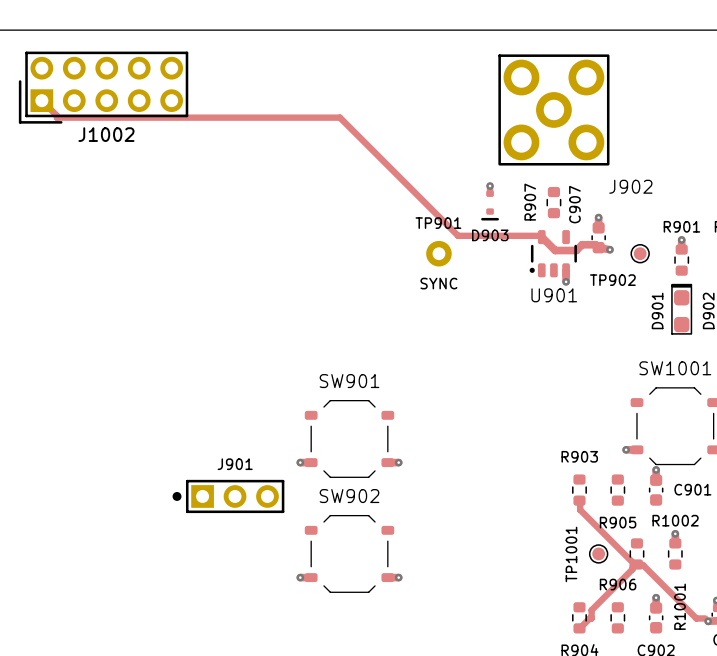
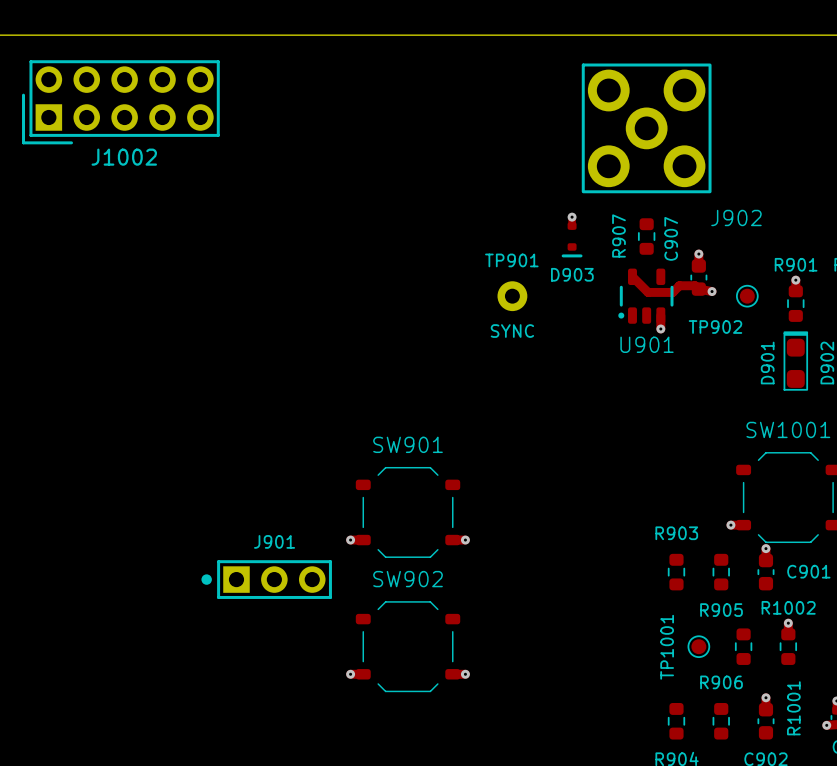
track: (42, 101) (56, 117) (339, 117) (458, 235) (540, 235) -> none
track: (580, 500) (580, 509) (636, 564) -> none
track: (632, 565) (632, 569) (591, 610) (591, 618) (580, 628) -> none
track: (638, 565) (643, 565) (696, 618) (705, 618) -> none

